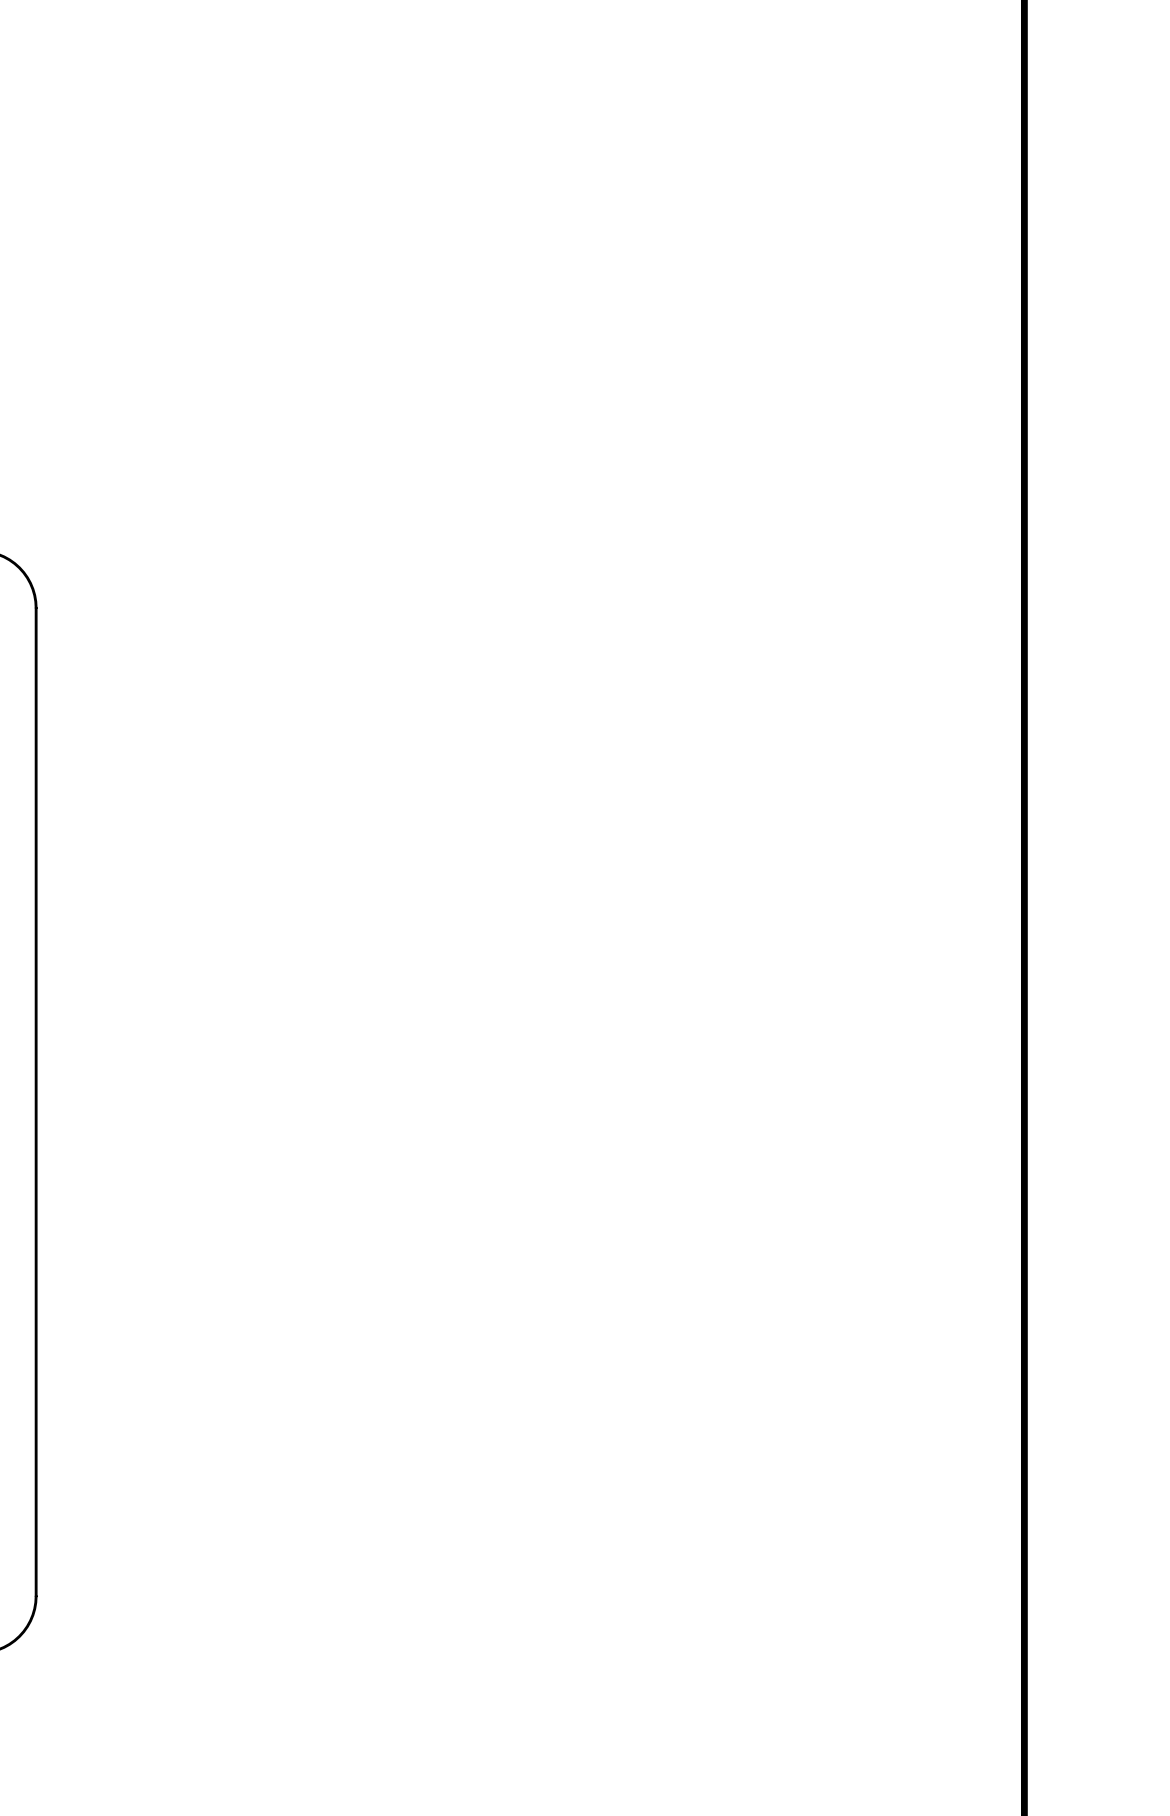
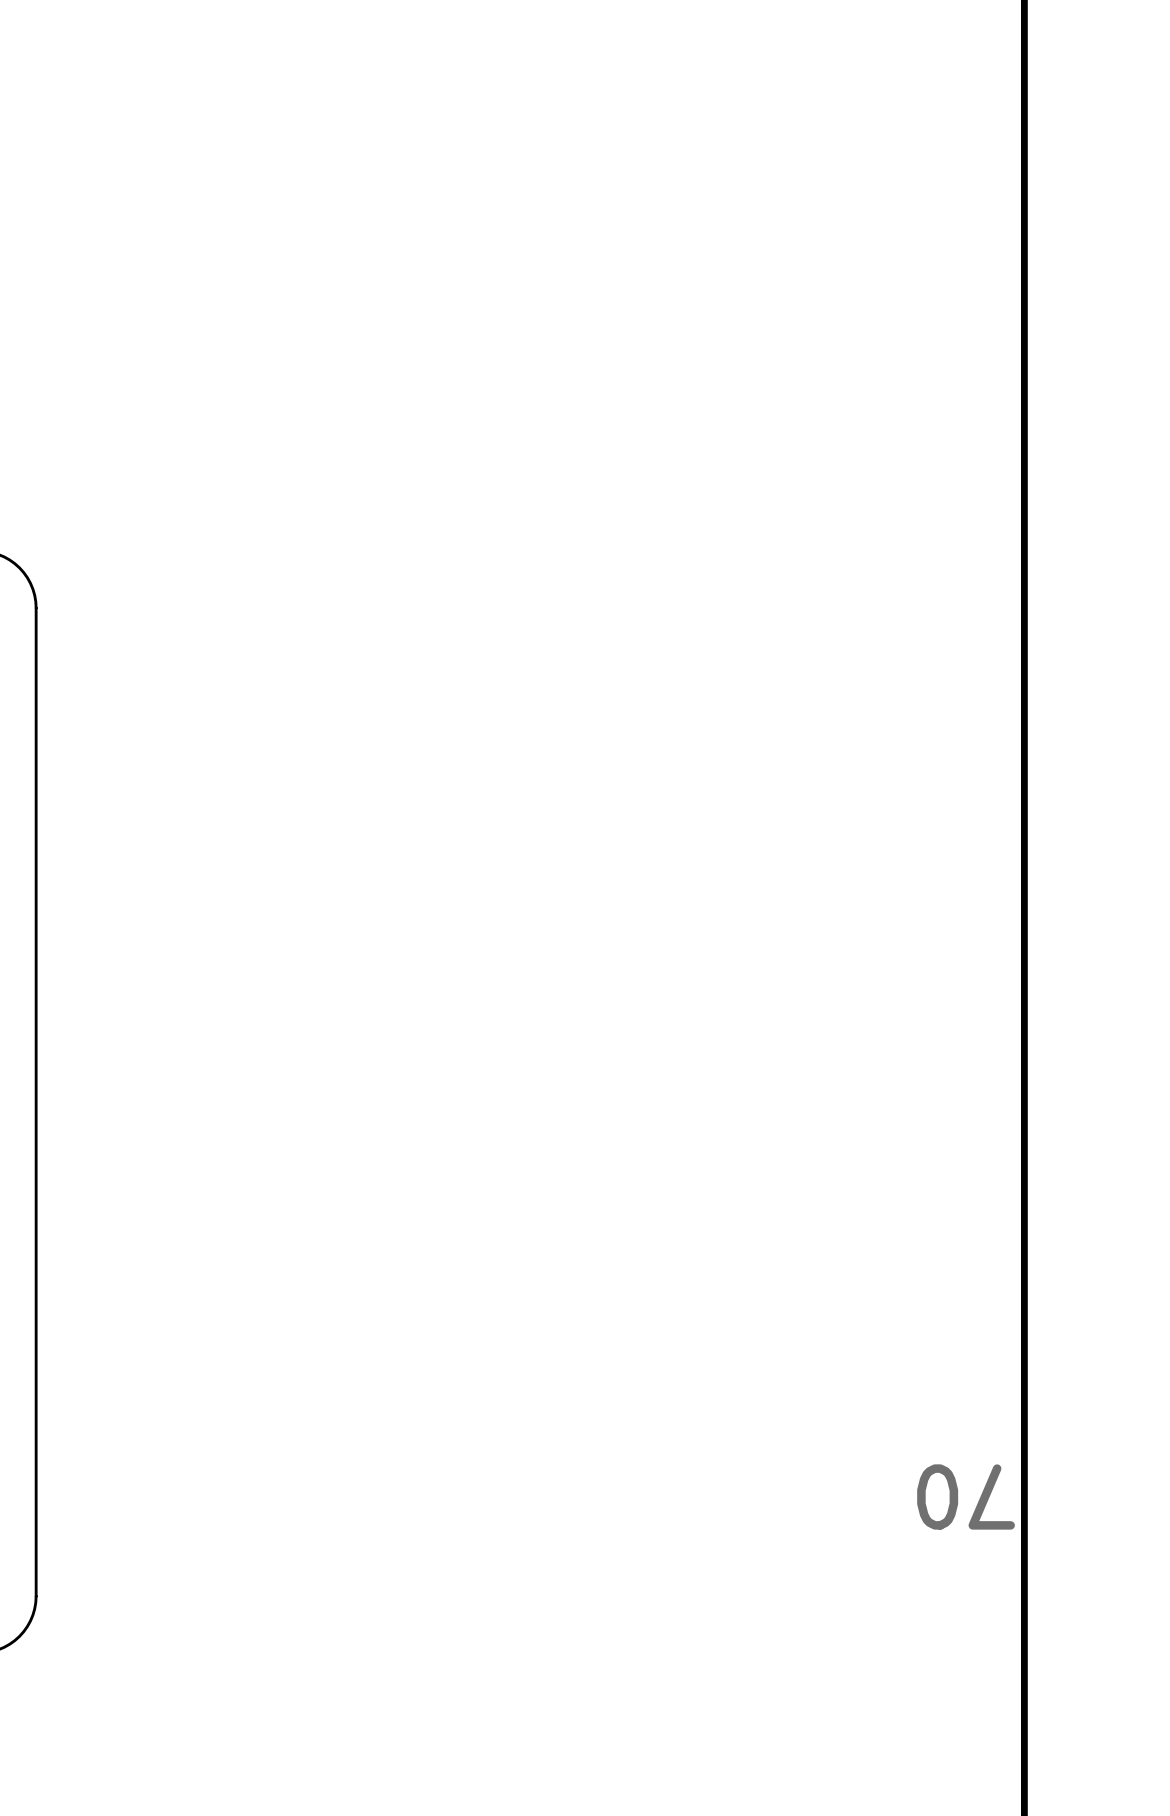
drawing: none -> [917, 1464, 1015, 1530]

